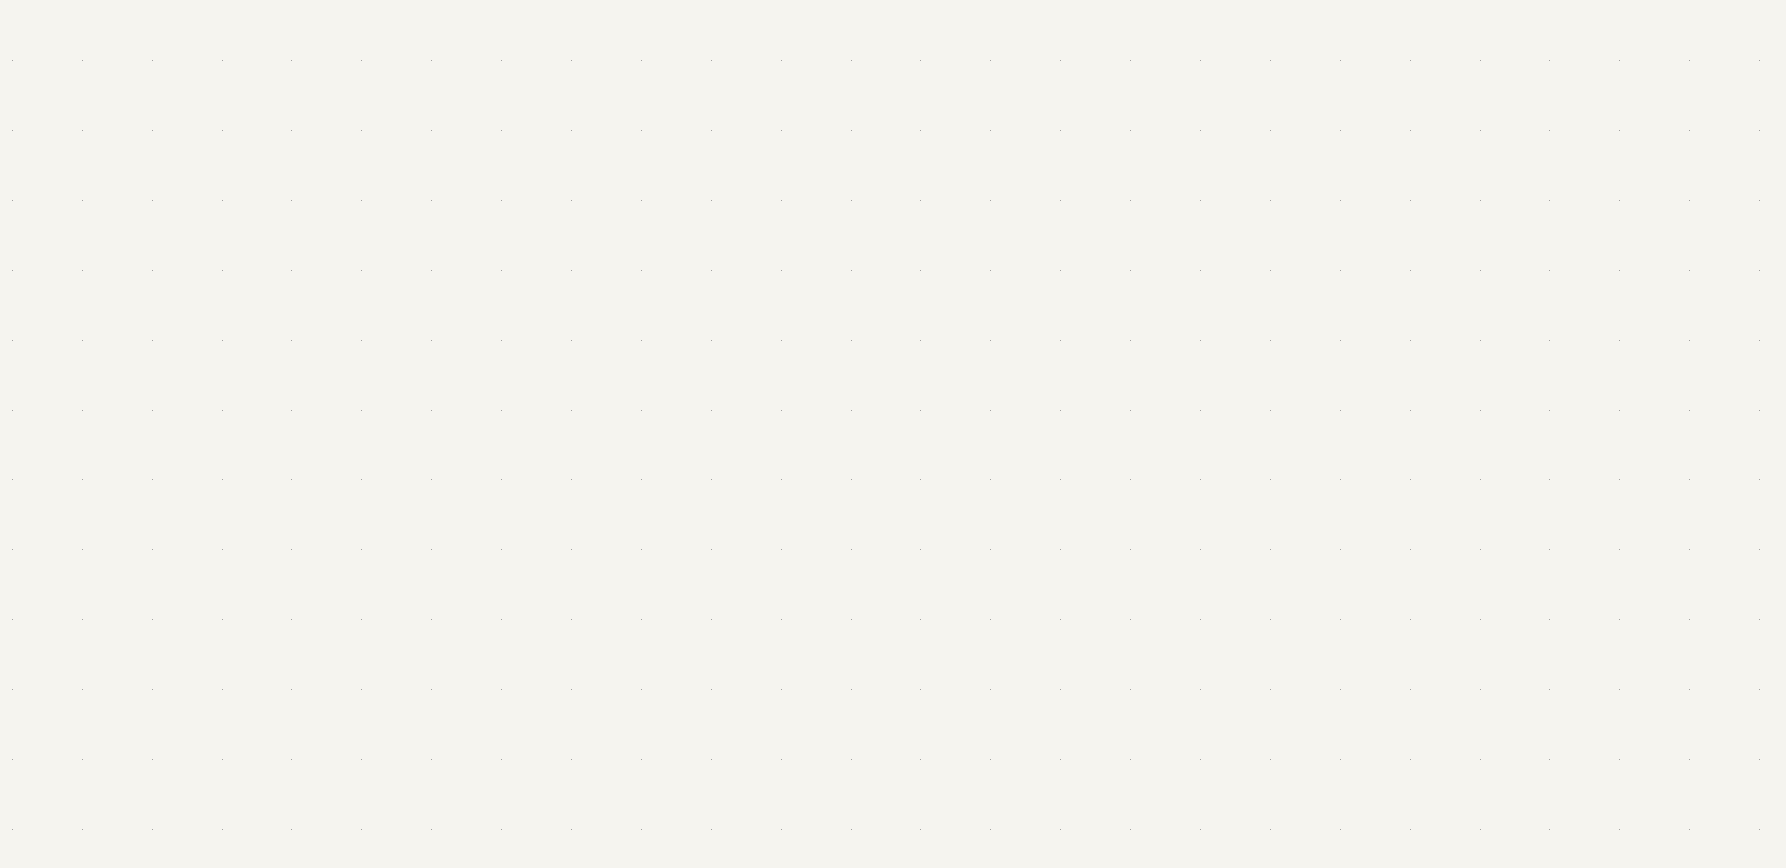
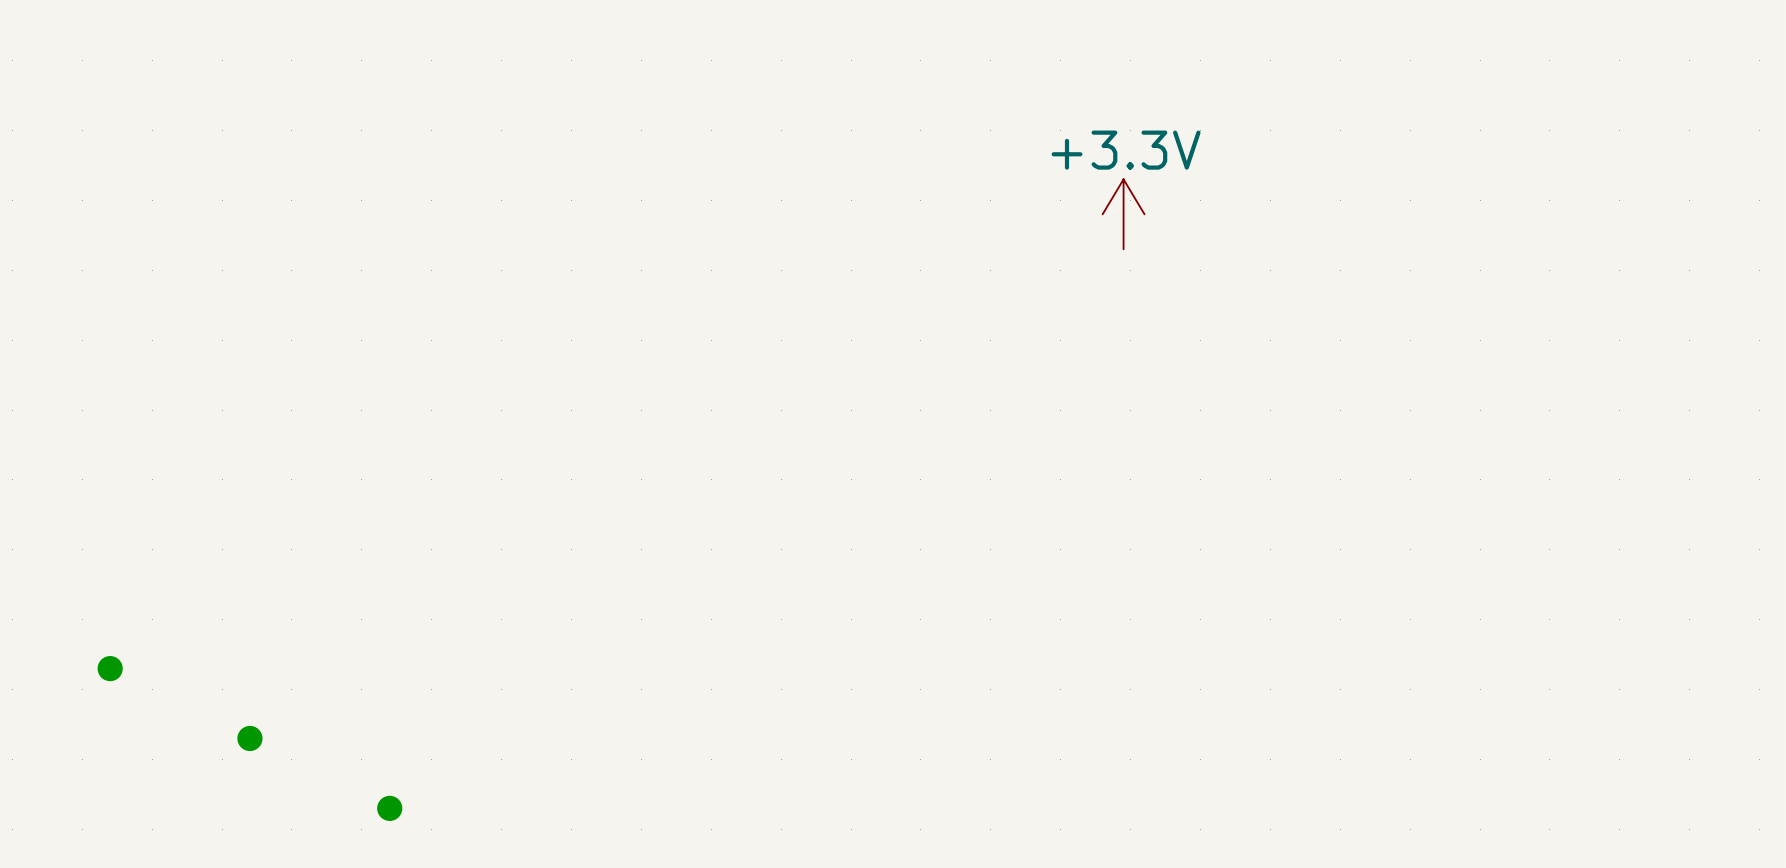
power symbol: none -> +3.3V (1123, 214)
junction: none -> (110, 668)
junction: none -> (249, 738)
junction: none -> (389, 808)

